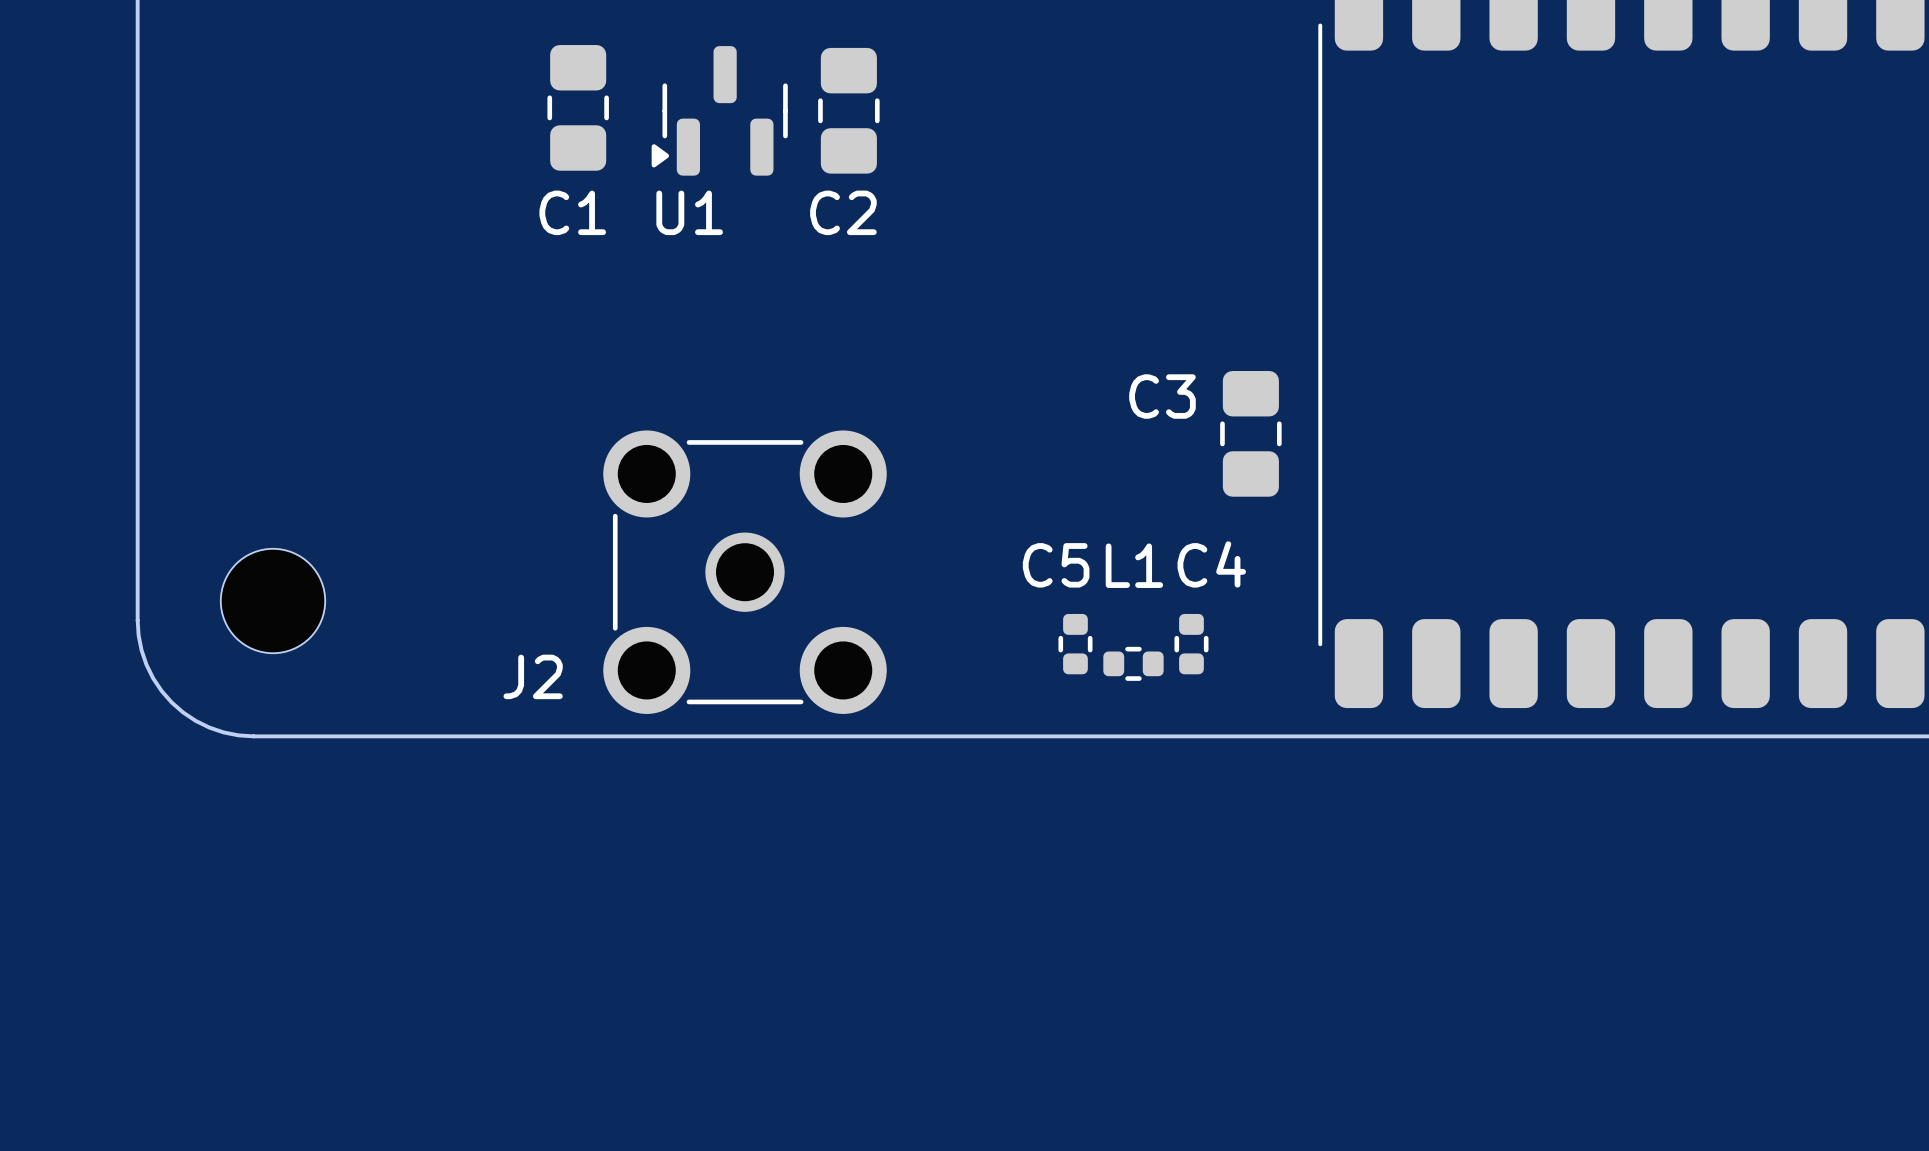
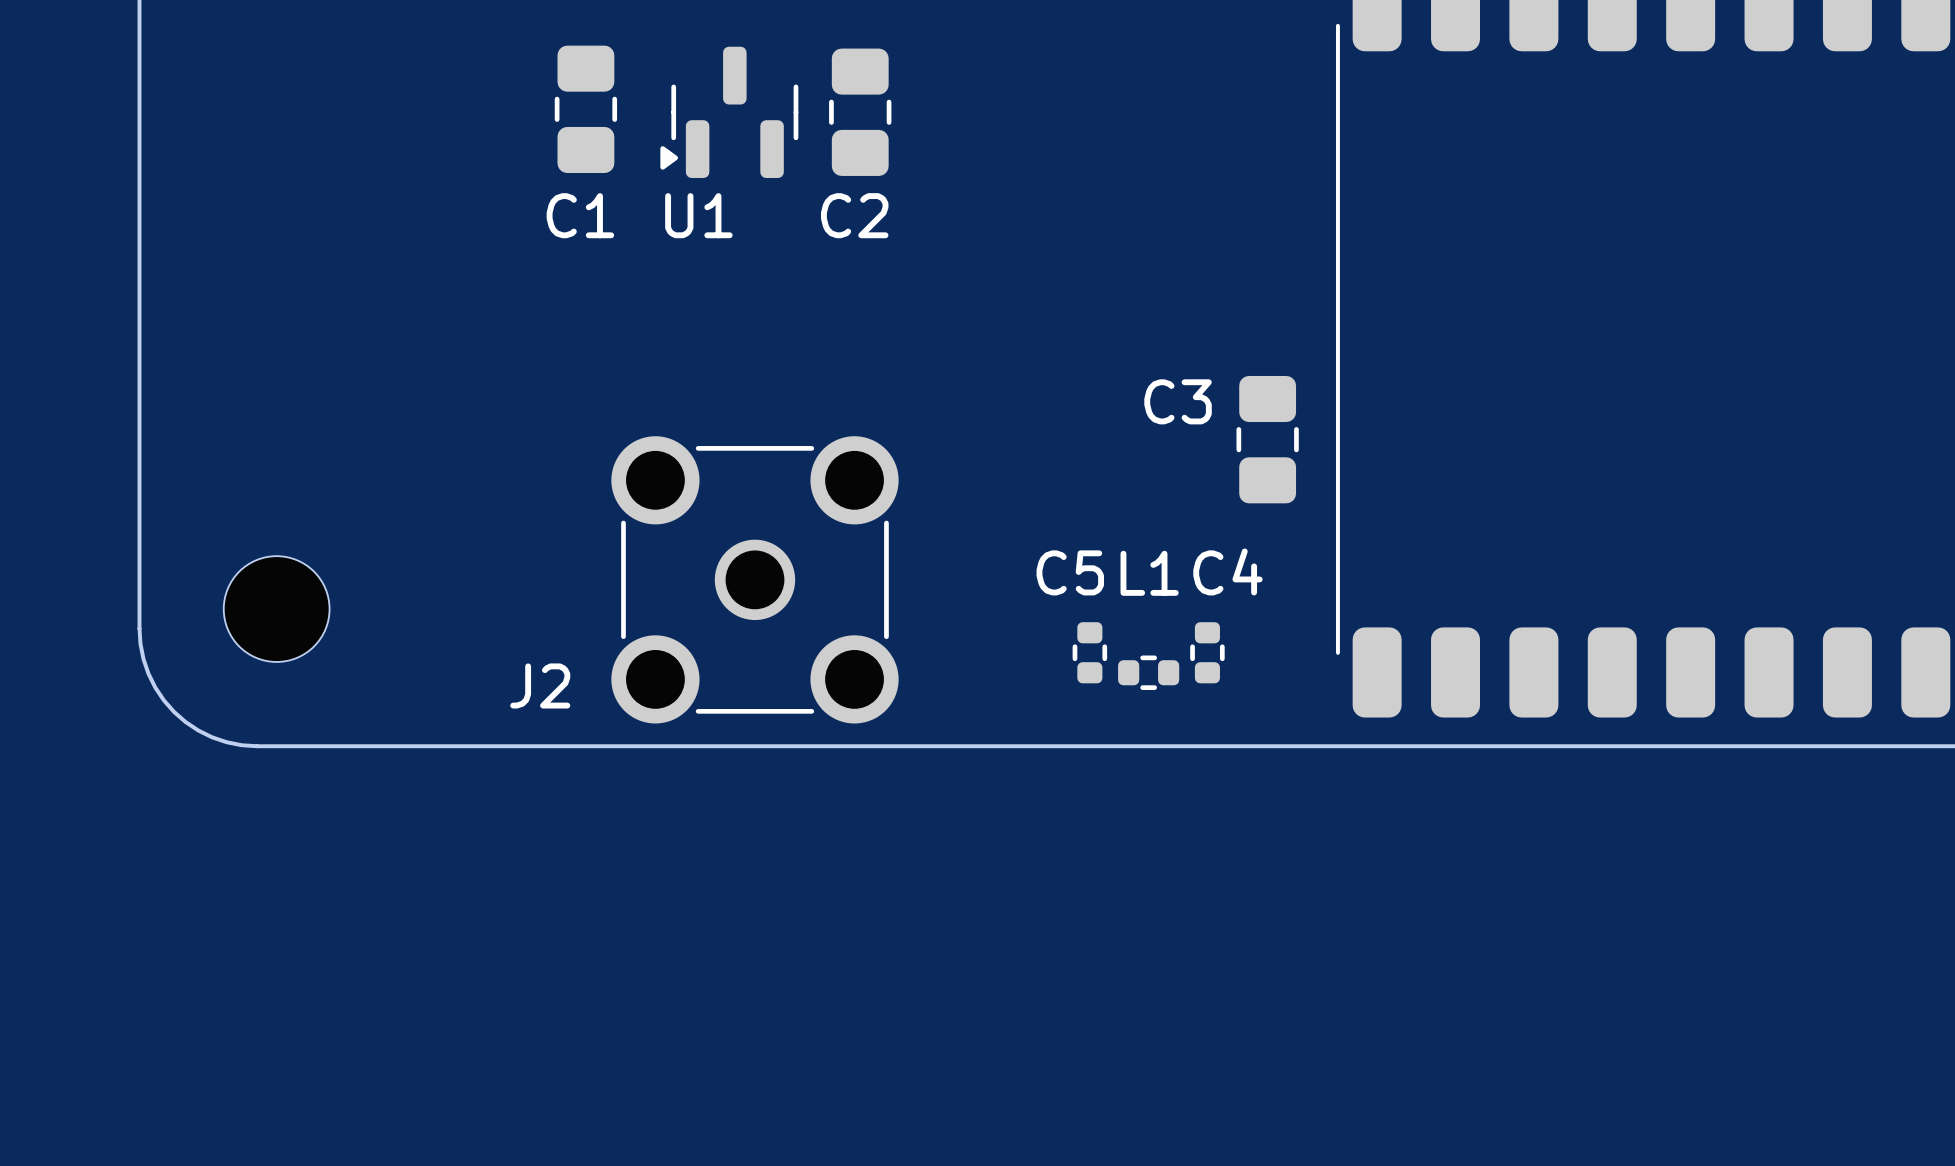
J2 footprint: [603, 430, 887, 714] -> [611, 436, 899, 724]

